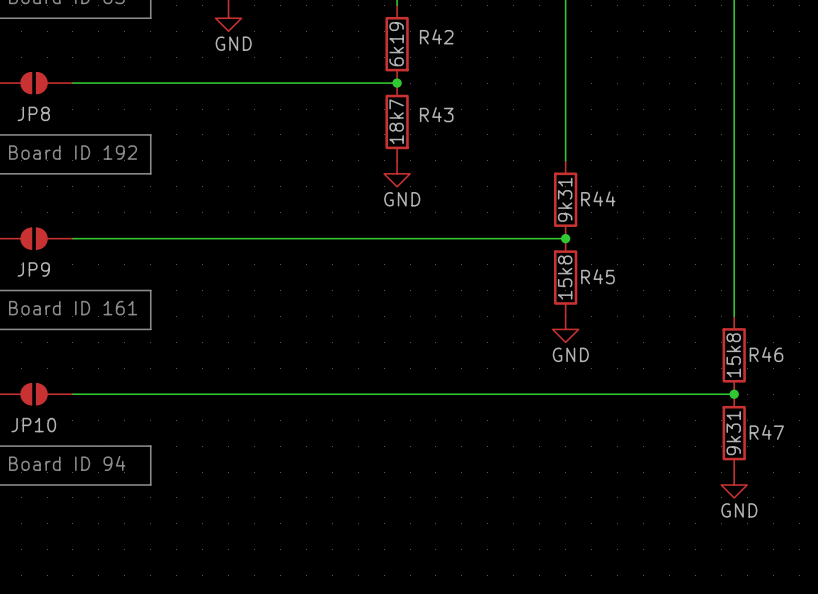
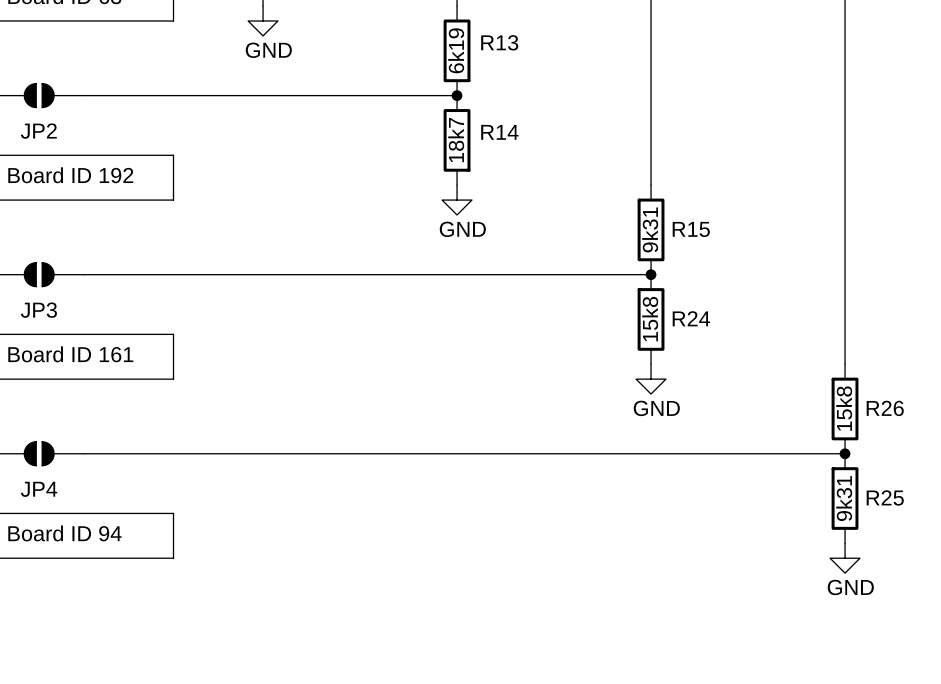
R42 name: R42 (436, 36) -> R13 (499, 42)
JP8 name: JP8 (33, 113) -> JP2 (38, 131)
R43 name: R43 (436, 114) -> R14 (499, 132)
R44 name: R44 (598, 198) -> R15 (691, 229)
JP9 name: JP9 (33, 269) -> JP3 (38, 310)
R45 name: R45 (597, 276) -> R24 (691, 318)
R46 name: R46 (766, 354) -> R26 (885, 408)
JP10 name: JP10 (33, 425) -> JP4 (39, 489)
R47 name: R47 (766, 432) -> R25 (885, 497)

